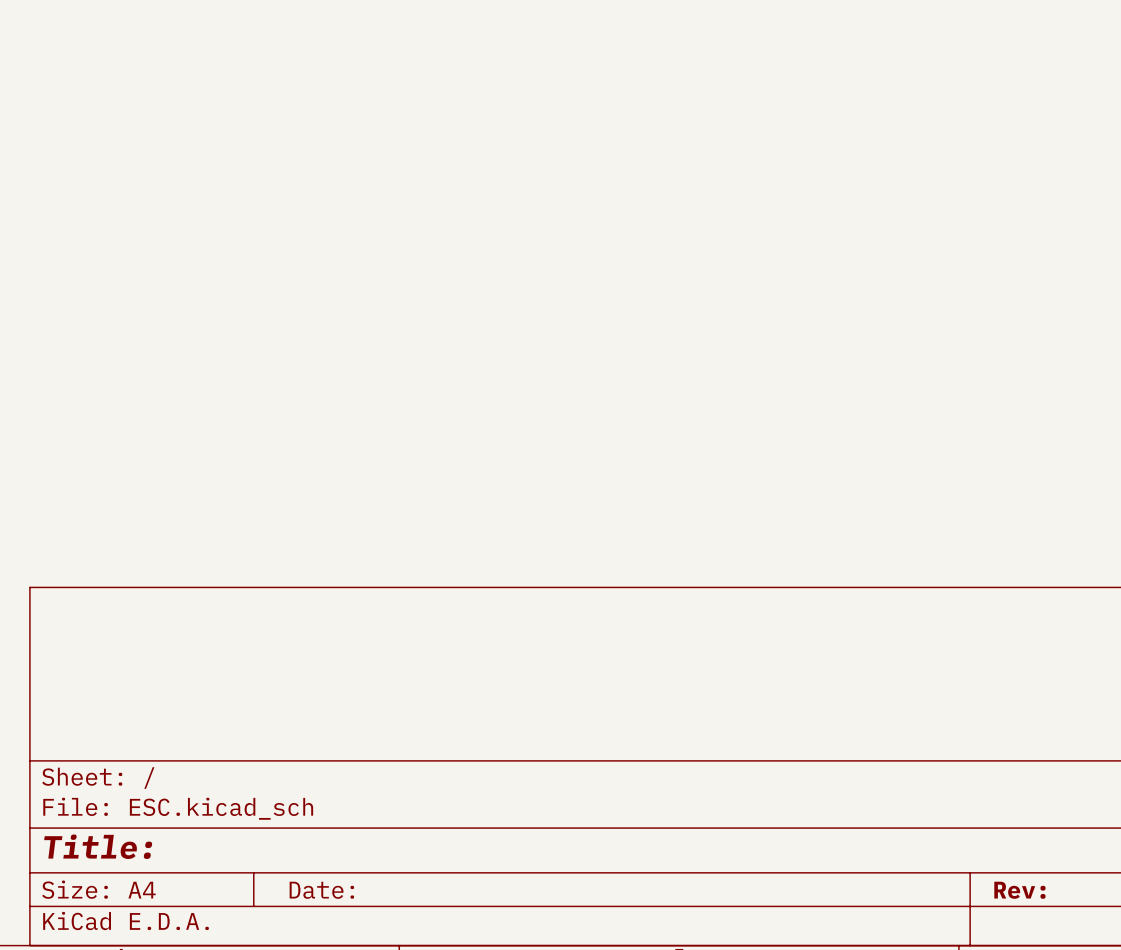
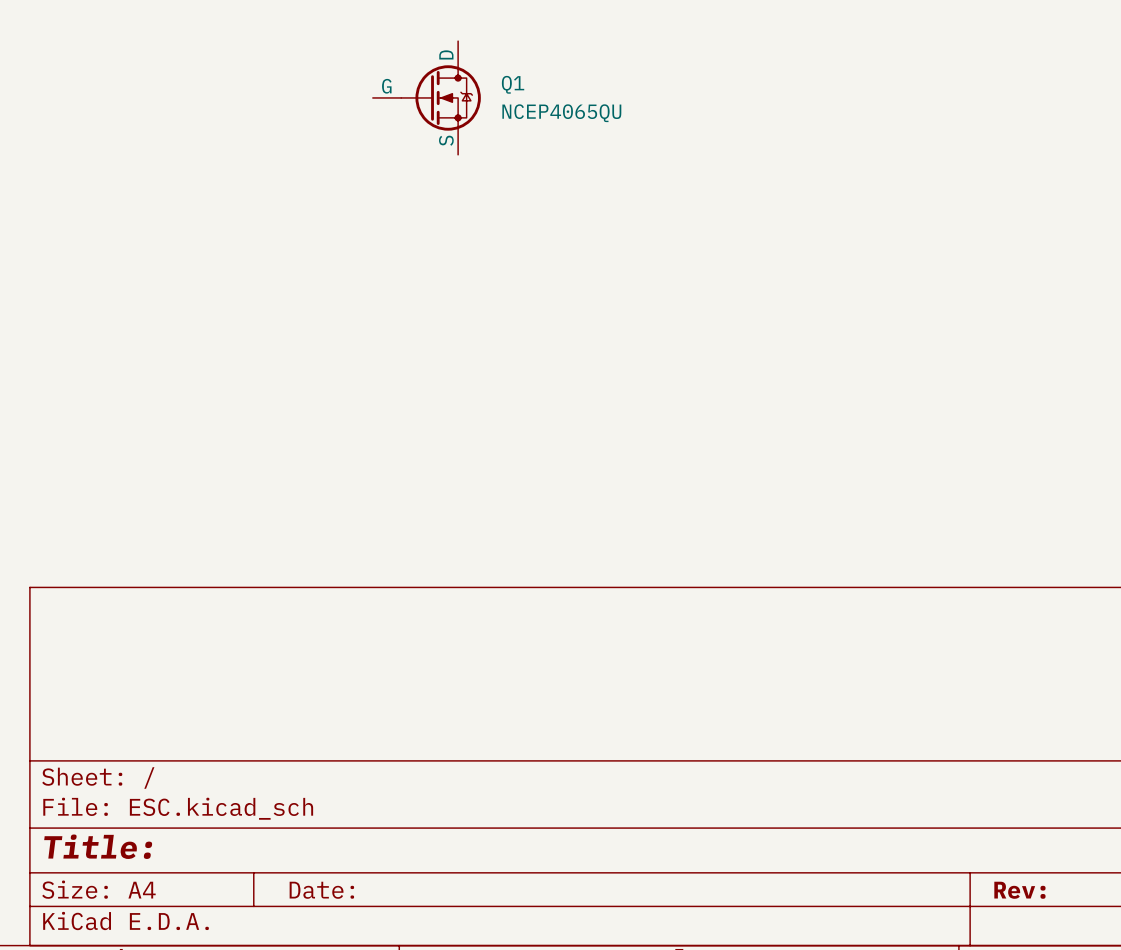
Q1: none -> NCEP4065QU (426, 97)

